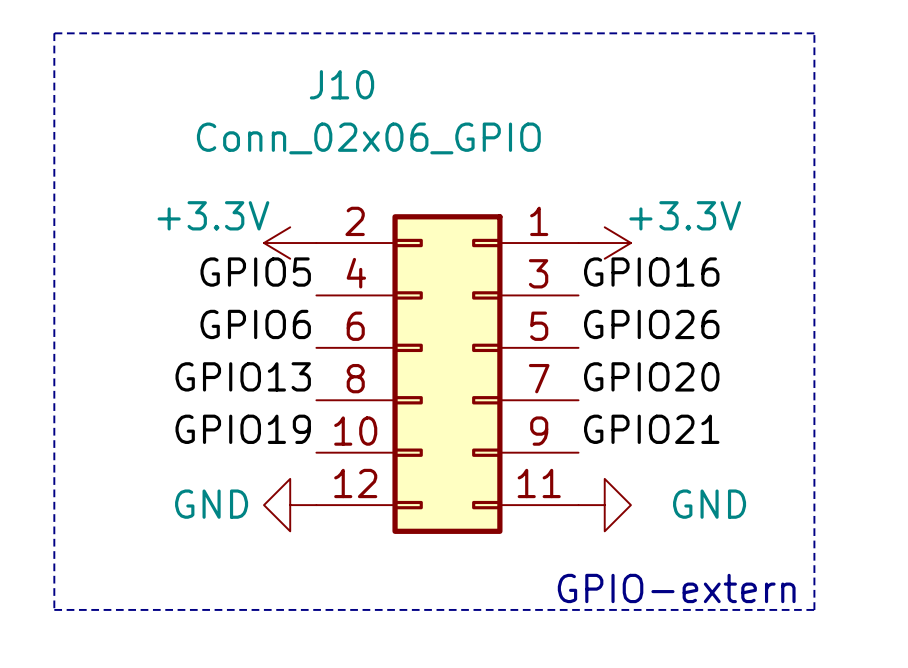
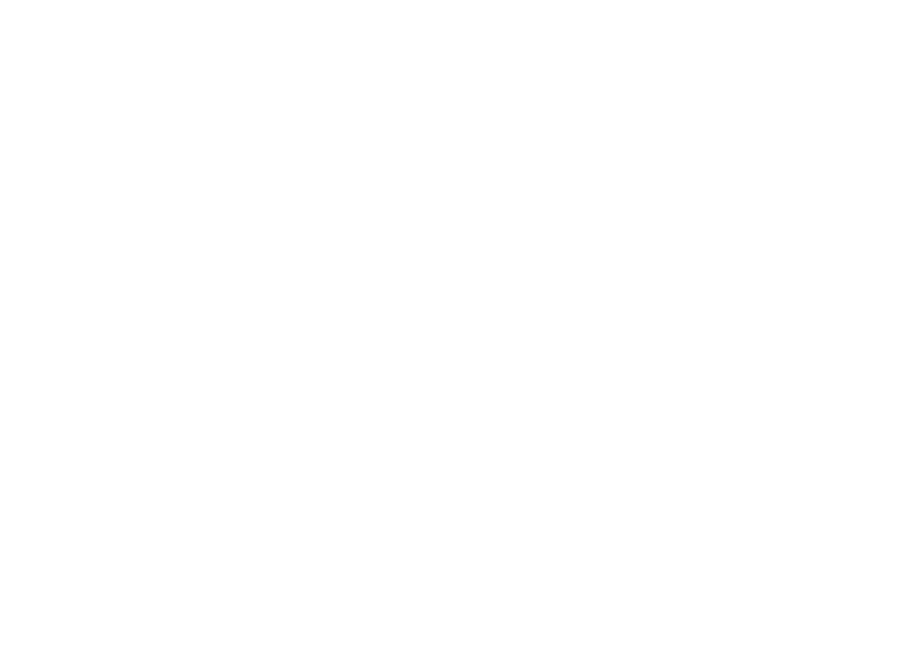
line: (54, 33) (54, 609) (814, 609) (814, 33) (54, 33) -> none
power symbol: +3.3V (290, 243) -> none
power symbol: +3.3V (604, 243) -> none
label: GPIO5 (255, 272) -> none
label: GPIO16 (651, 272) -> none
label: GPIO6 (255, 324) -> none
label: GPIO26 (651, 324) -> none
J10: Conn_02x06_GPIO (447, 374) -> none
label: GPIO13 (243, 376) -> none
label: GPIO20 (651, 376) -> none
label: GPIO19 (243, 429) -> none
label: GPIO21 (651, 429) -> none
power symbol: GND (290, 505) -> none
power symbol: GND (604, 505) -> none
text: GPIO-extern (676, 588) -> none

